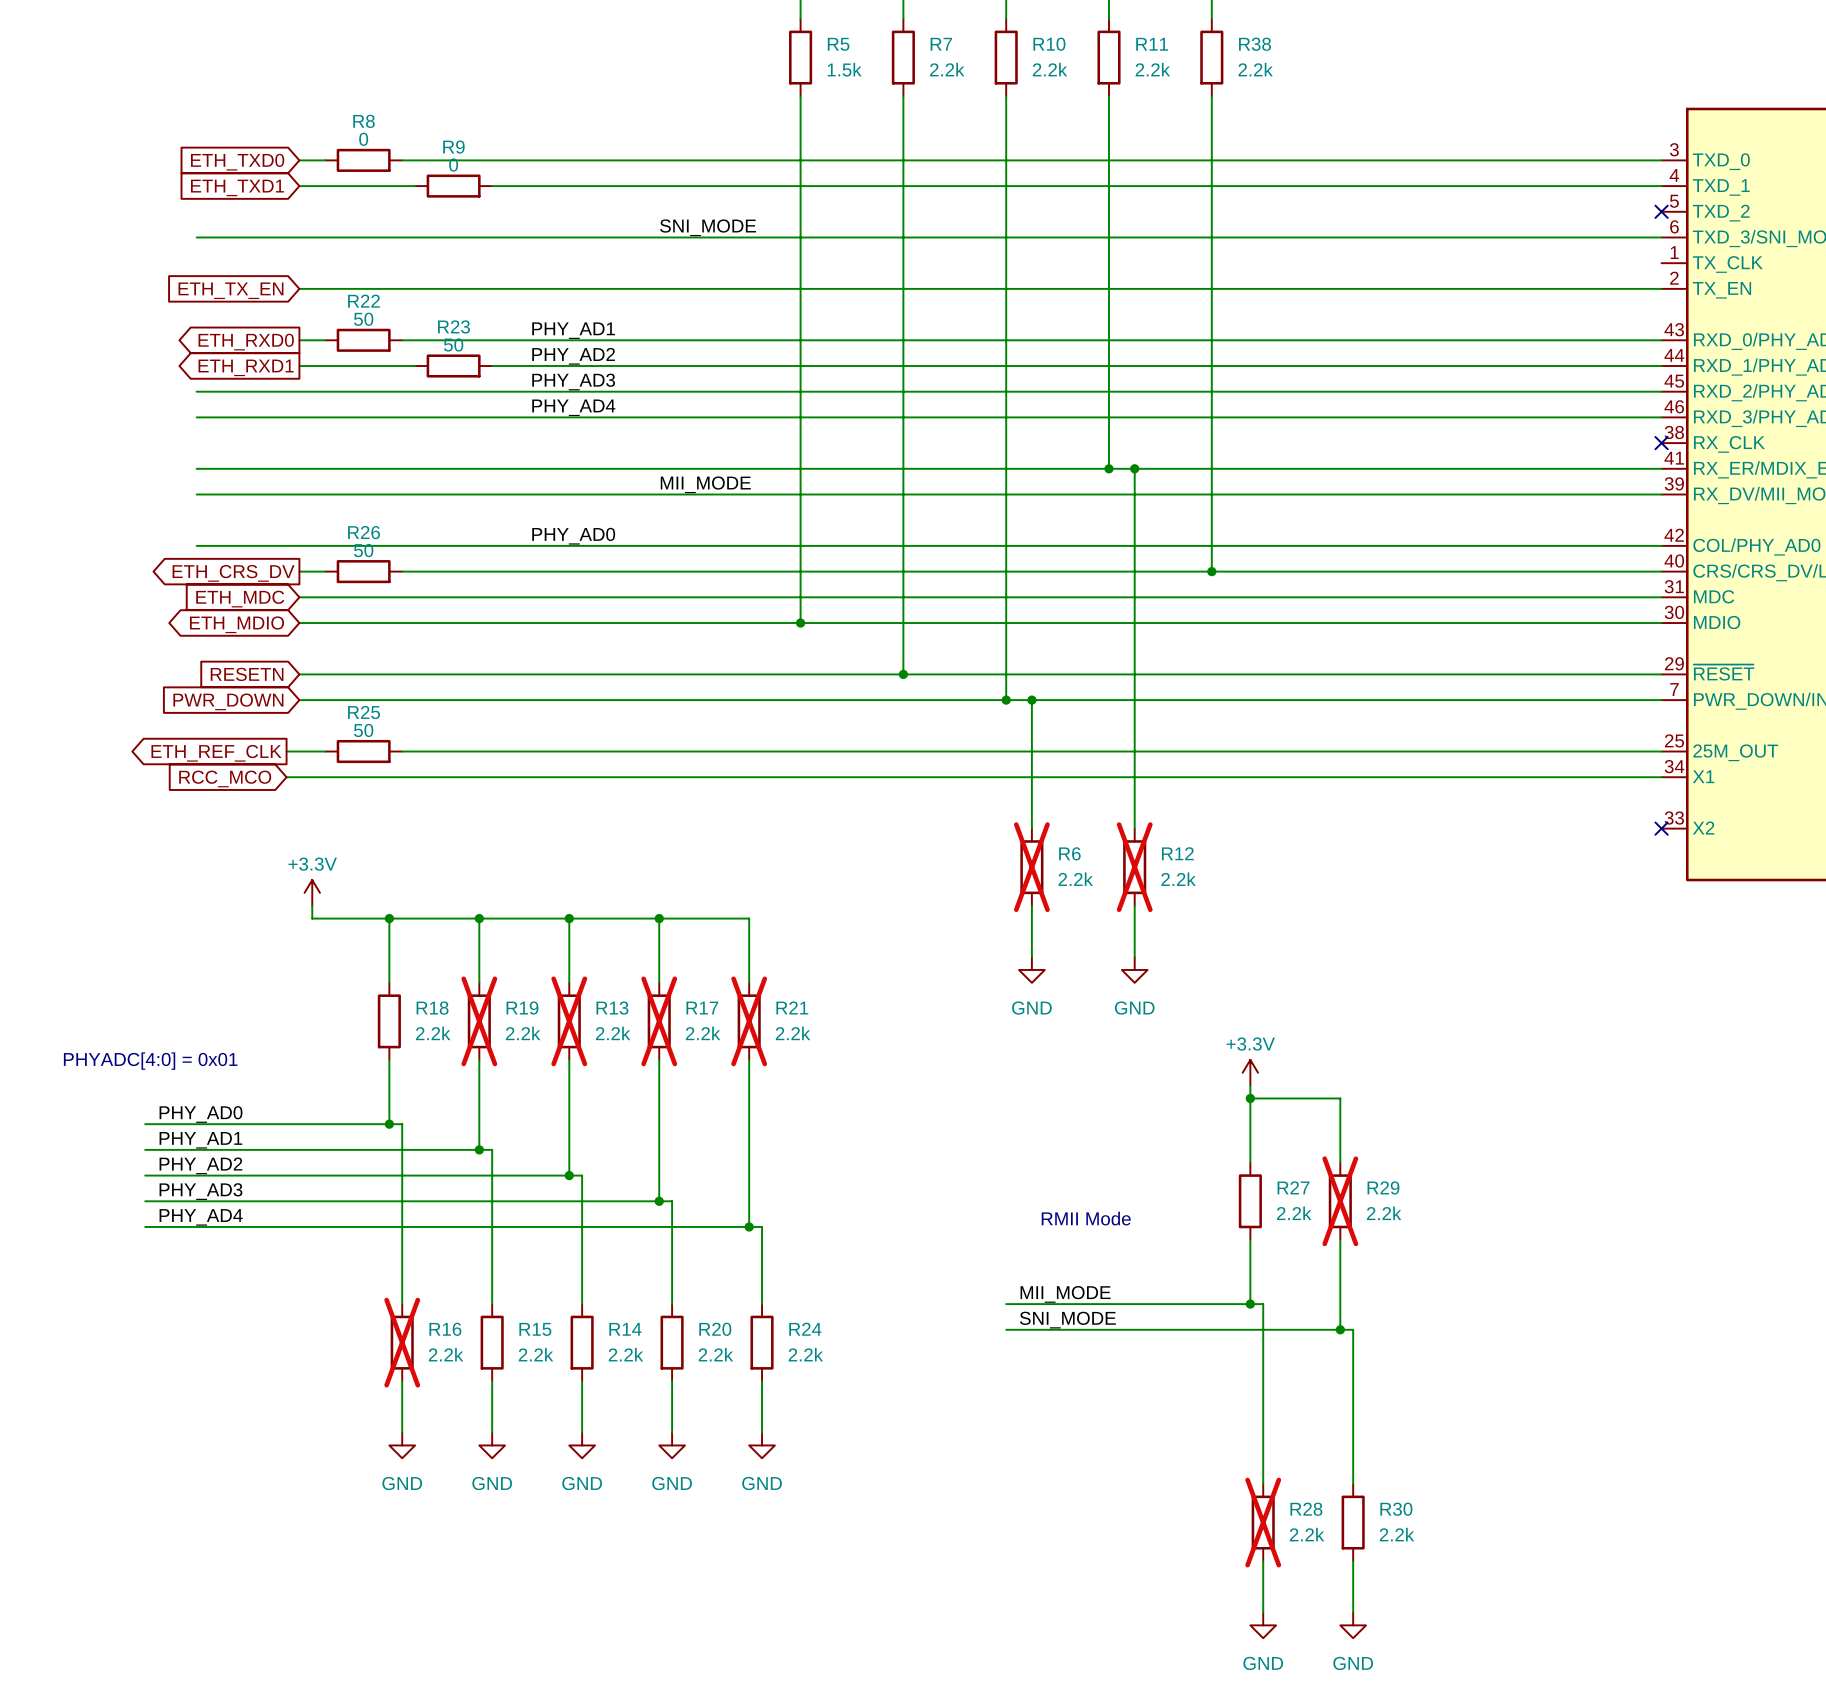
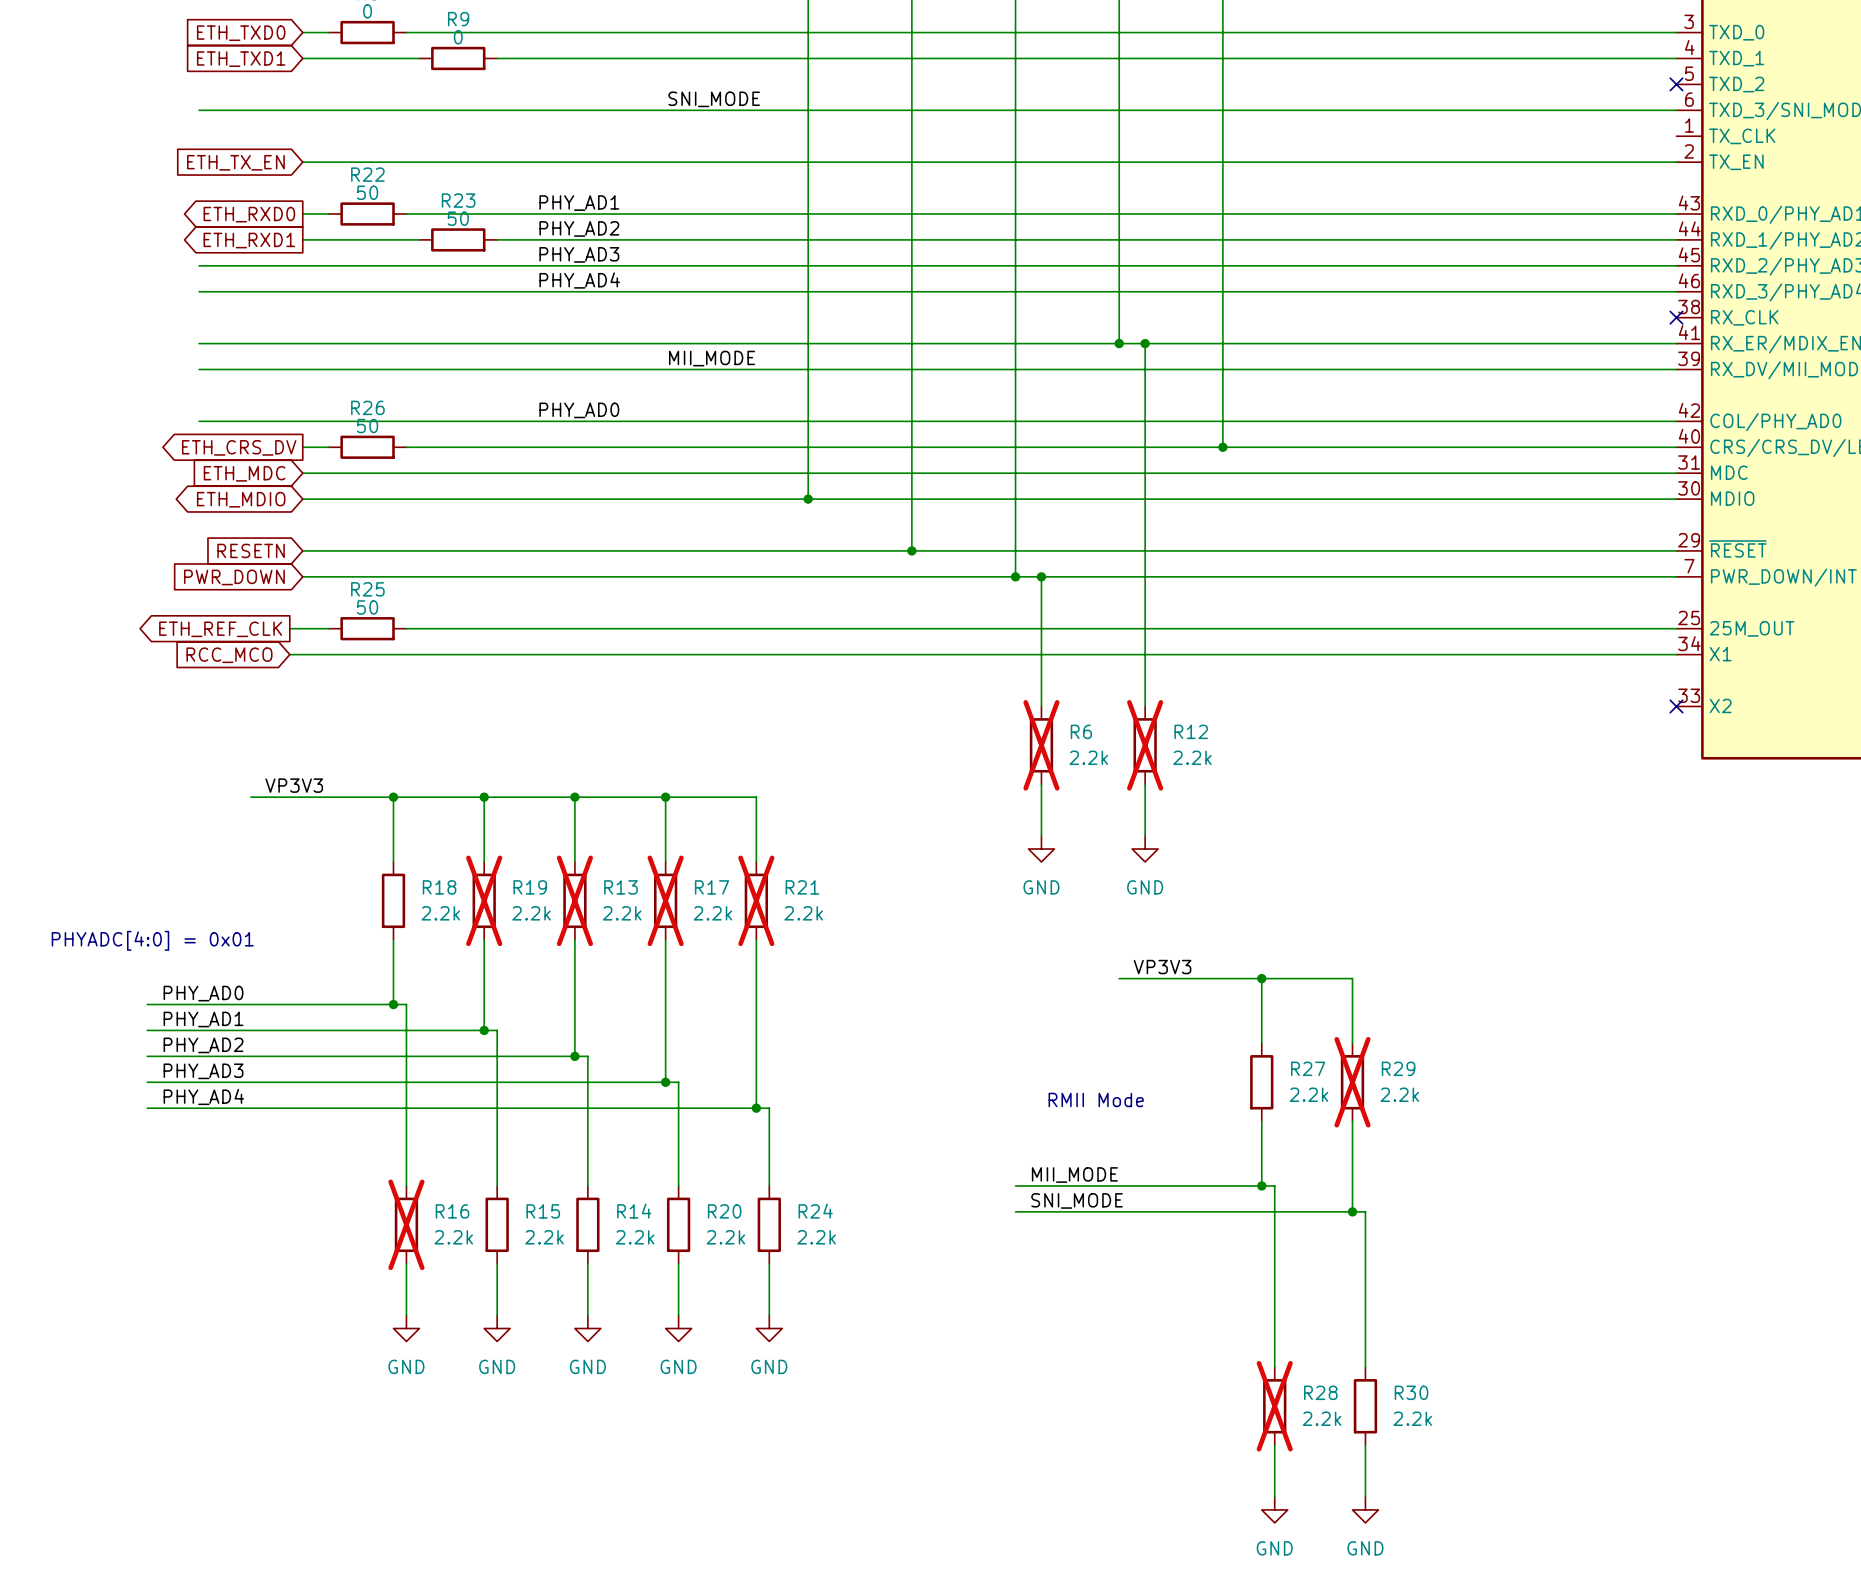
power symbol: +3.3V (312, 892) -> none
wire: (312, 905) (312, 918) -> (250, 797) (315, 797)
label: none -> VP3V3 (294, 785)
power symbol: +3.3V (1250, 1072) -> none
wire: (1250, 1085) (1250, 1098) -> (1119, 978) (1261, 978)
label: none -> VP3V3 (1162, 967)

